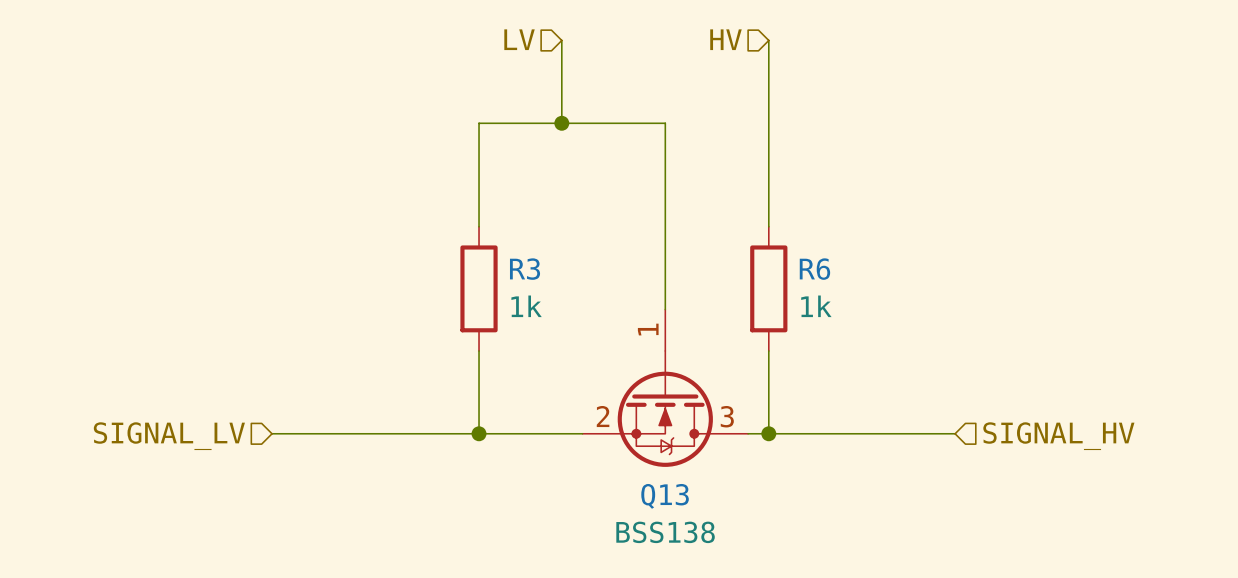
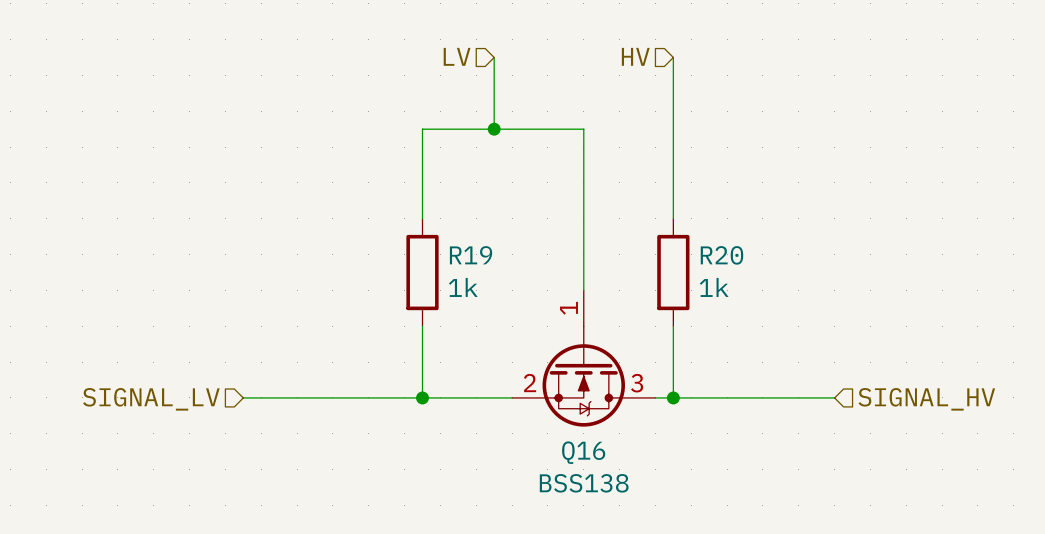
R3 name: R3 (525, 269) -> R19 (471, 255)
R6 name: R6 (814, 269) -> R20 (721, 255)
Q13 name: Q13 (665, 496) -> Q16 (583, 452)

